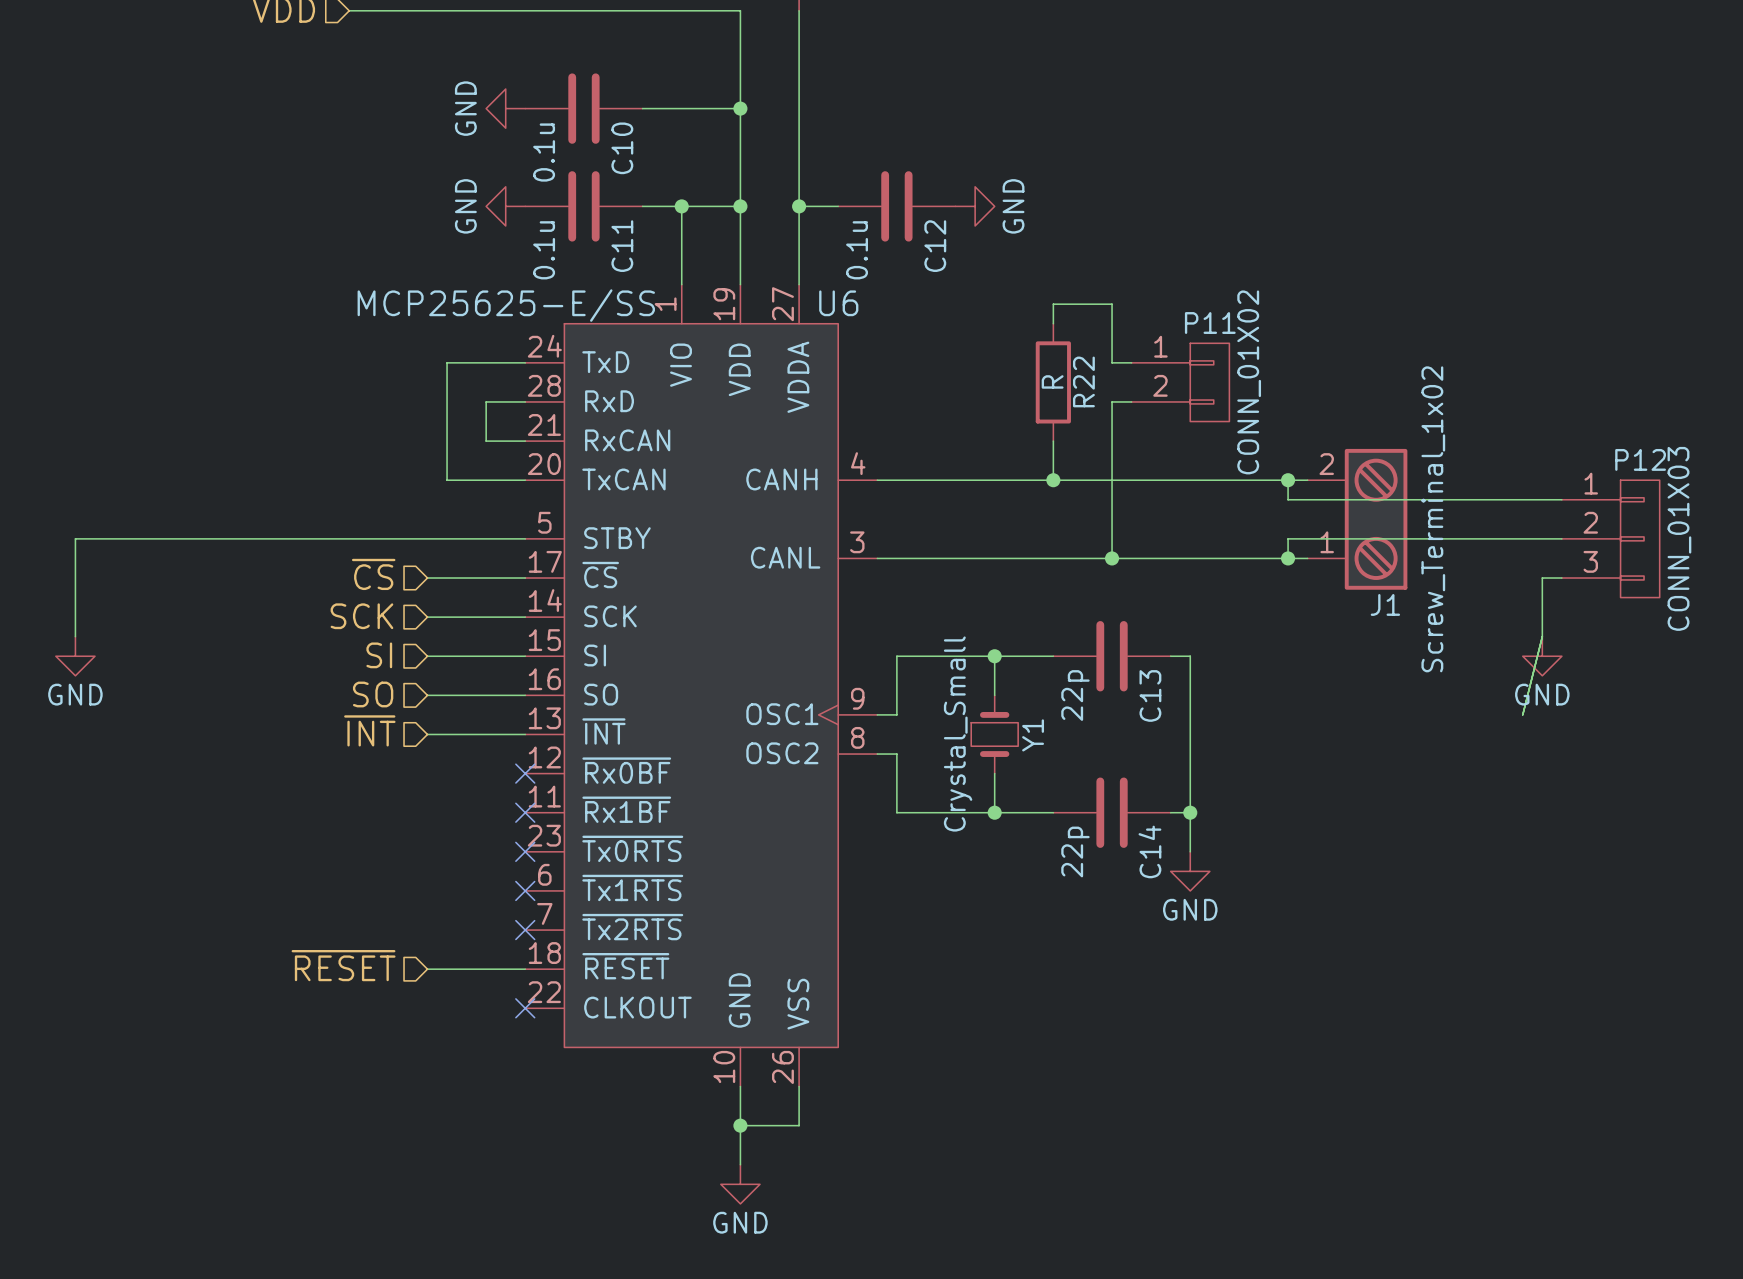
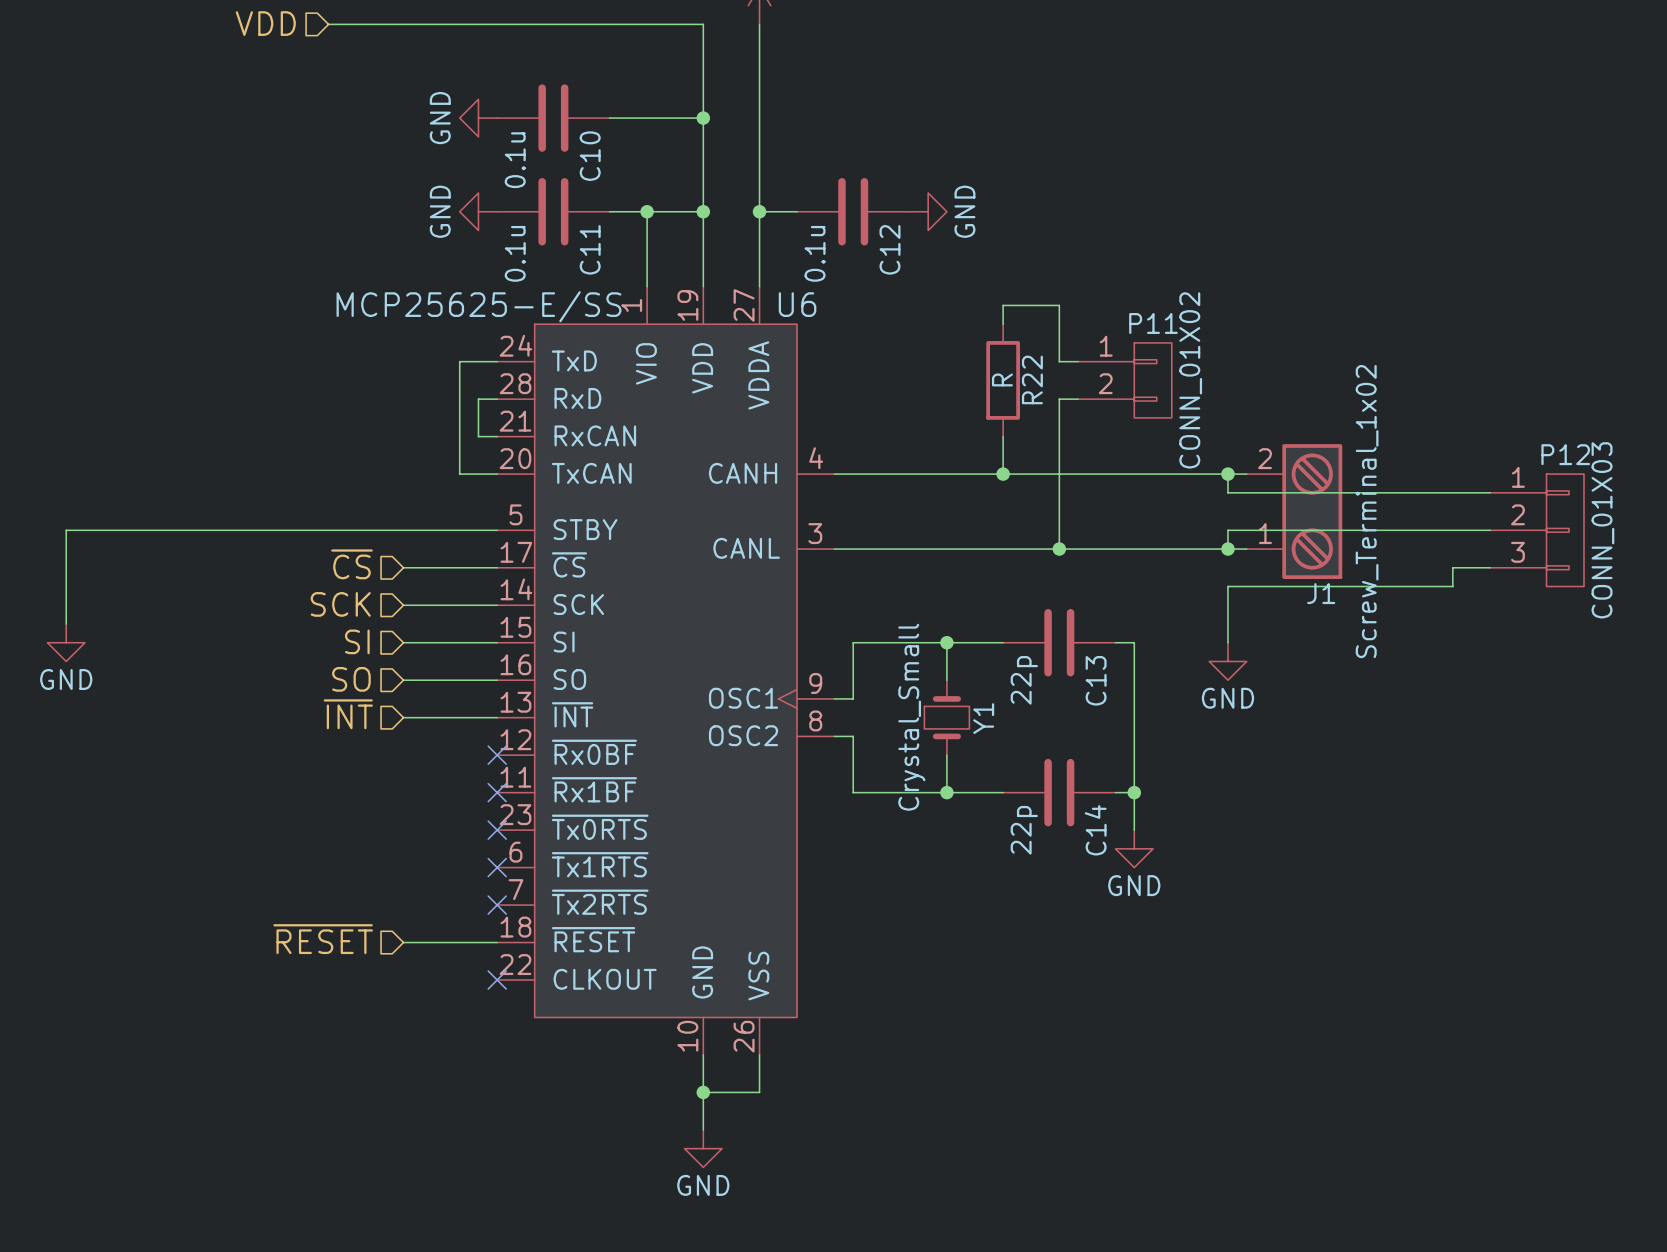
wire: (486, 362) (447, 362) (447, 480) (486, 480) -> none
wire: (486, 401) (505, 401) -> (459, 399) (459, 361)
wire: none -> (478, 399) (478, 436)
wire: (486, 441) (505, 441) -> (459, 436) (459, 474)
wire: (1542, 578) (1542, 636) (1522, 714) -> (1471, 567) (1452, 567) (1452, 586) (1227, 586) (1227, 642)
power symbol position: GND (1542, 656) -> GND (1227, 661)

